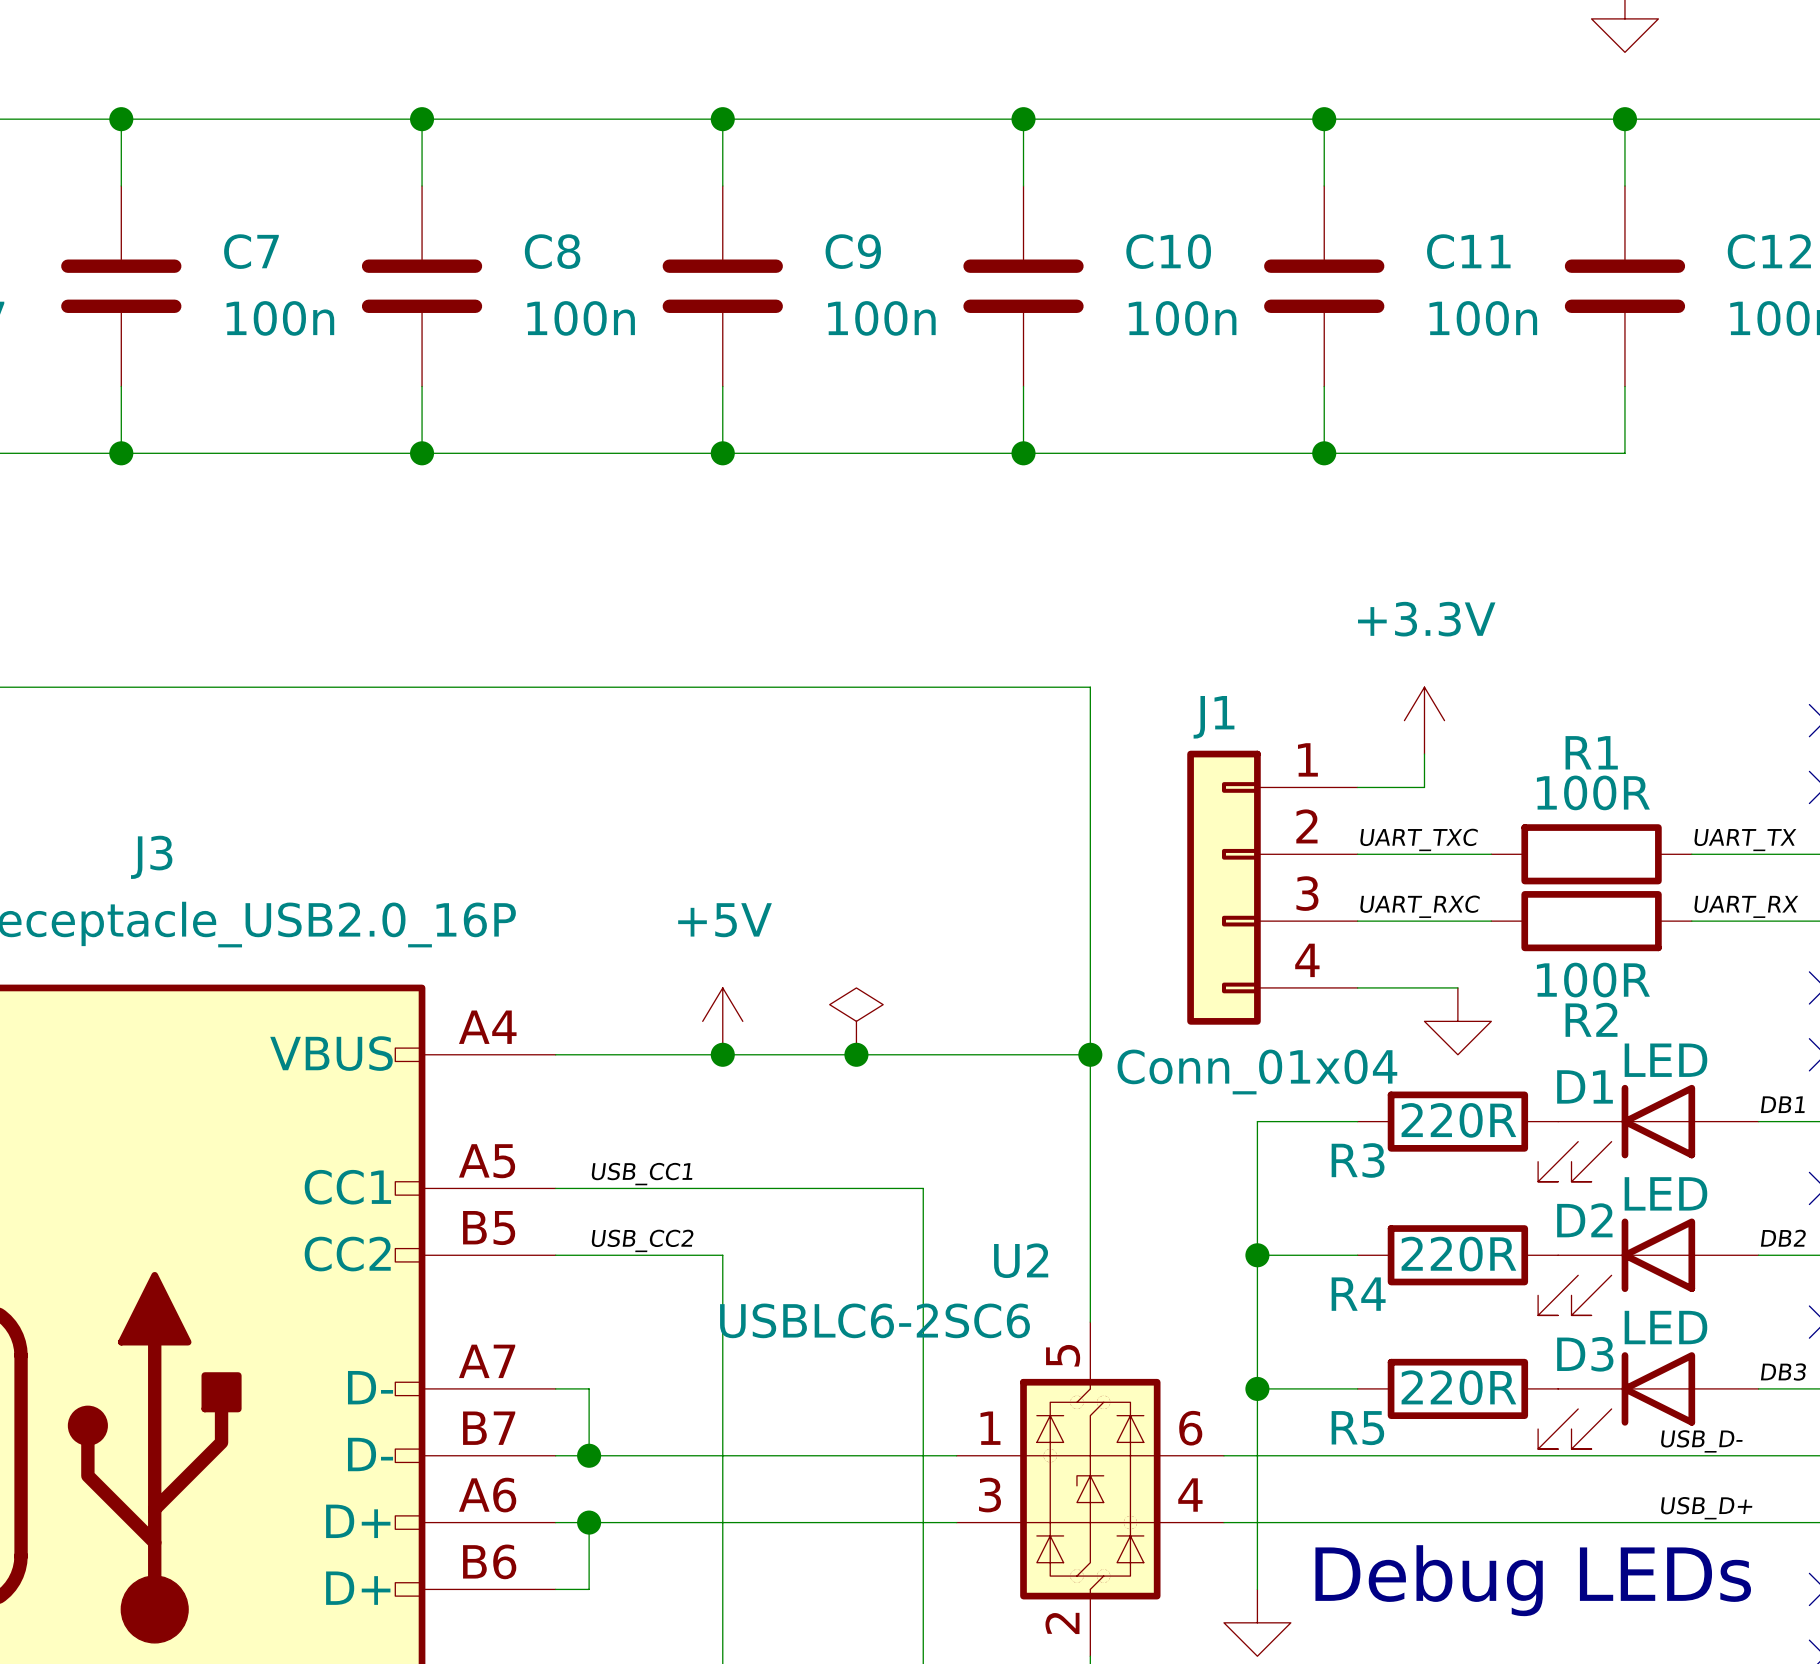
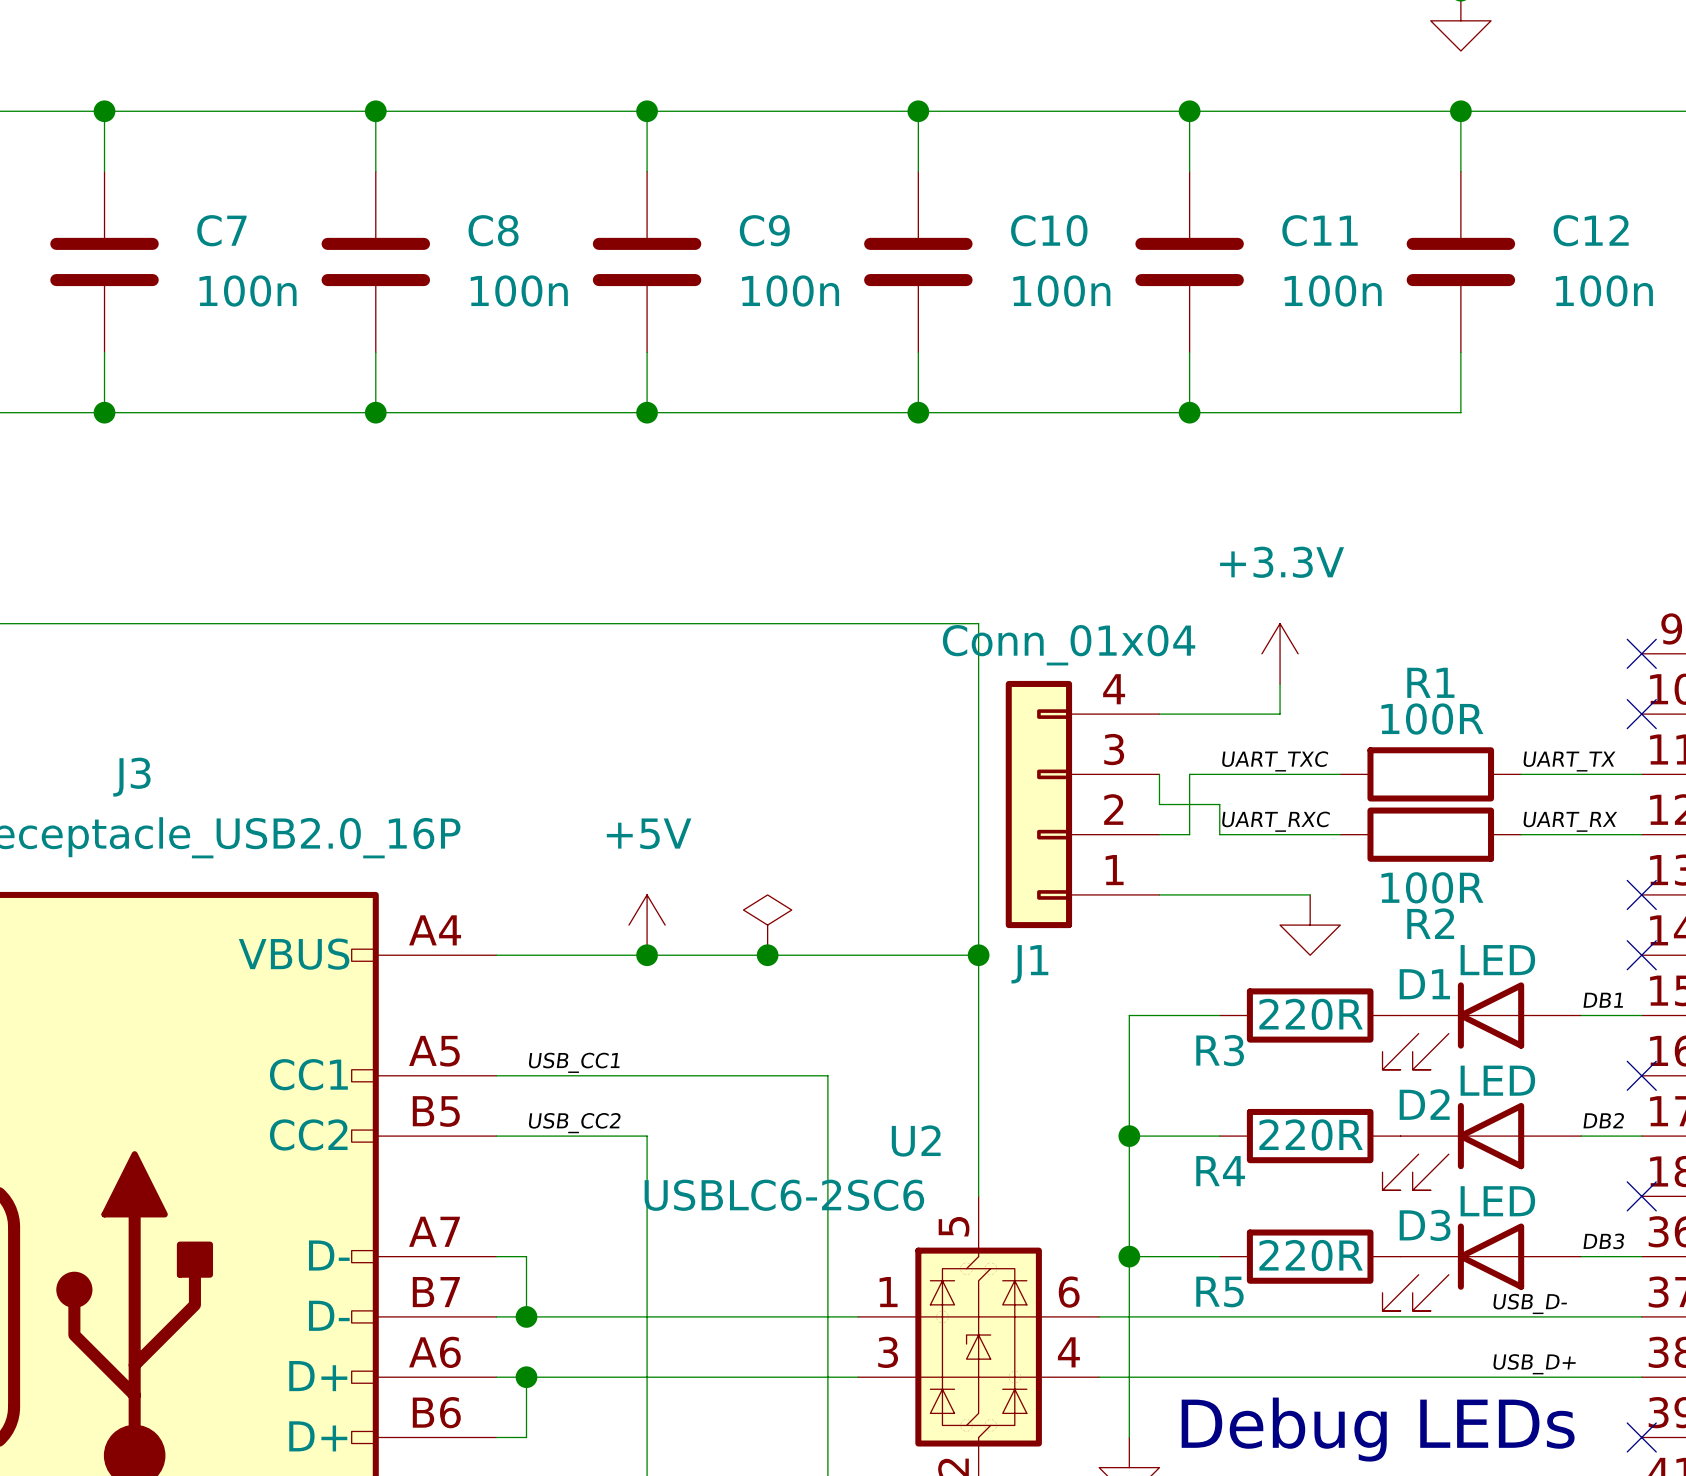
wire: none -> (1159, 774) (1159, 804) (1219, 804) (1219, 834)
wire: none -> (1219, 774) (1189, 774) (1189, 834) (1159, 834)
J1 flip: as is (1223, 887) -> up-down (1038, 804)

